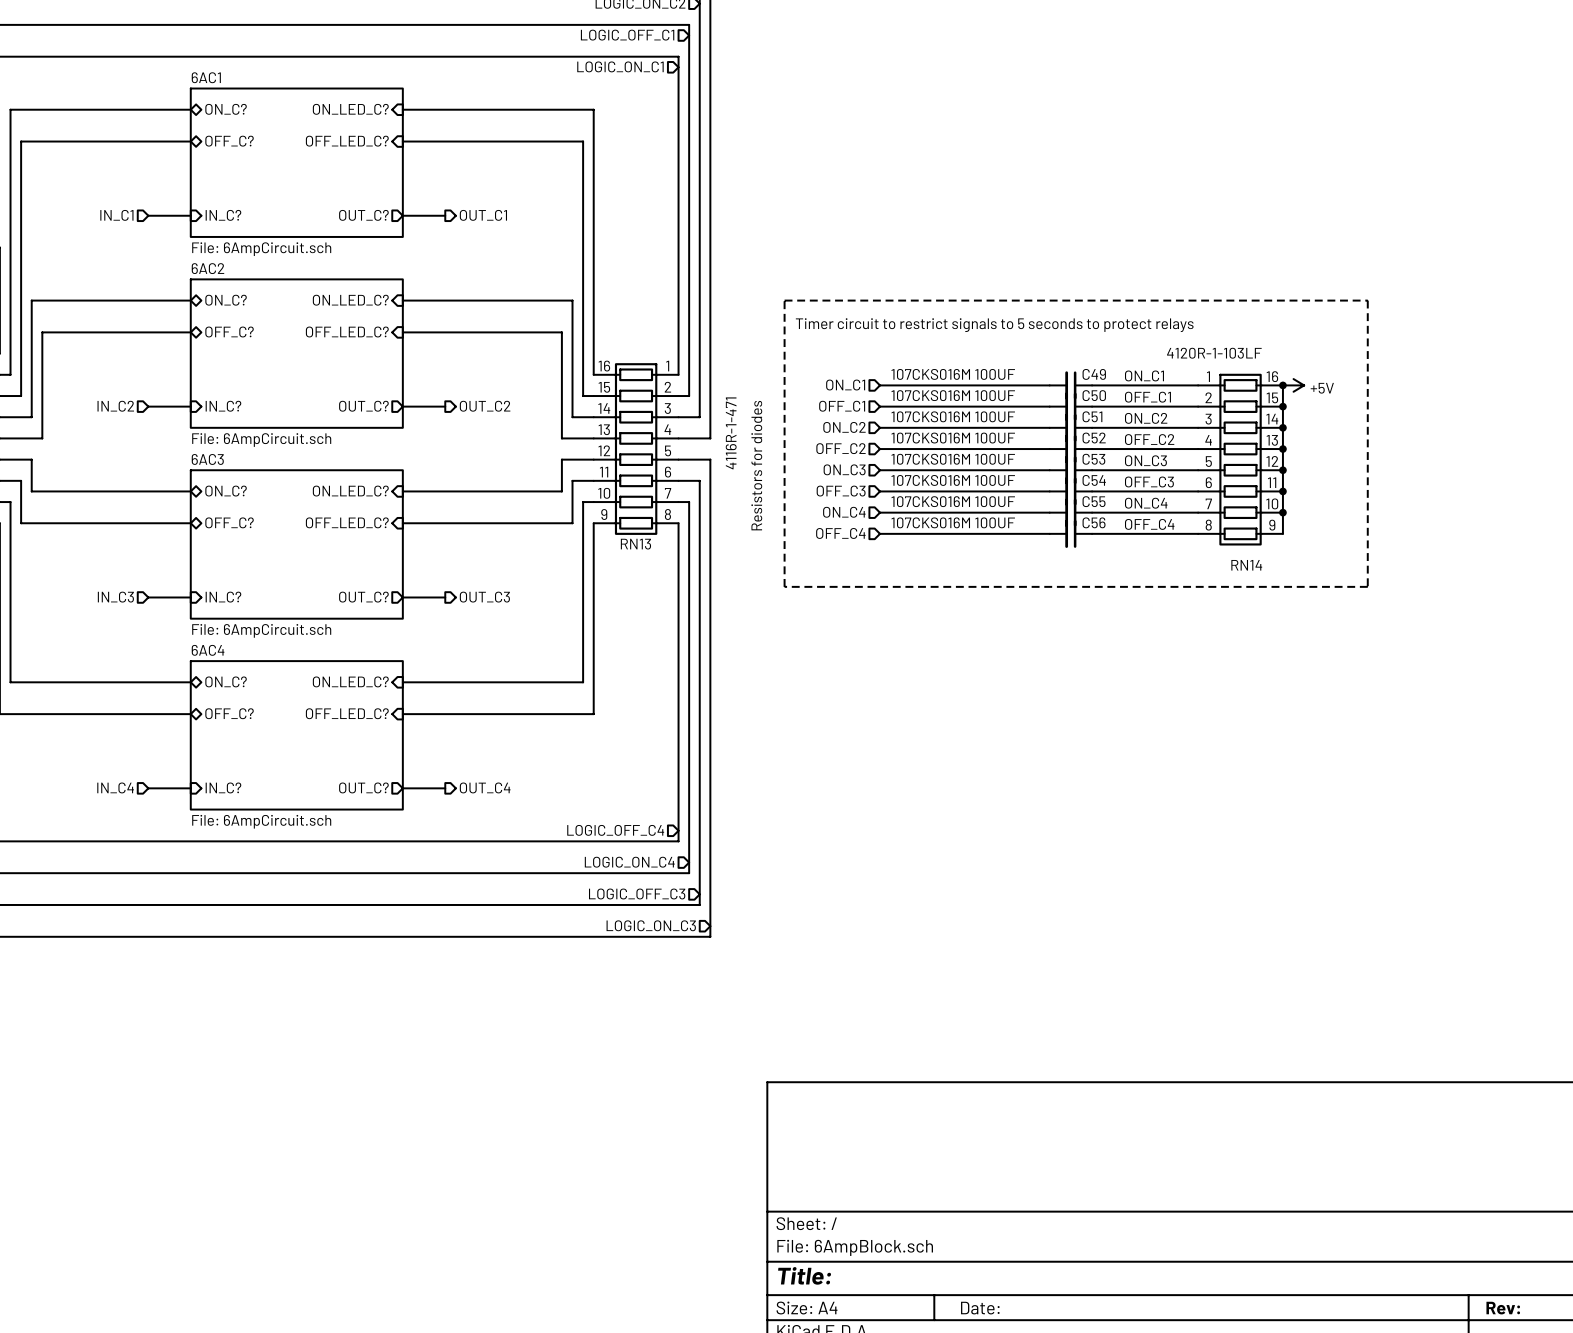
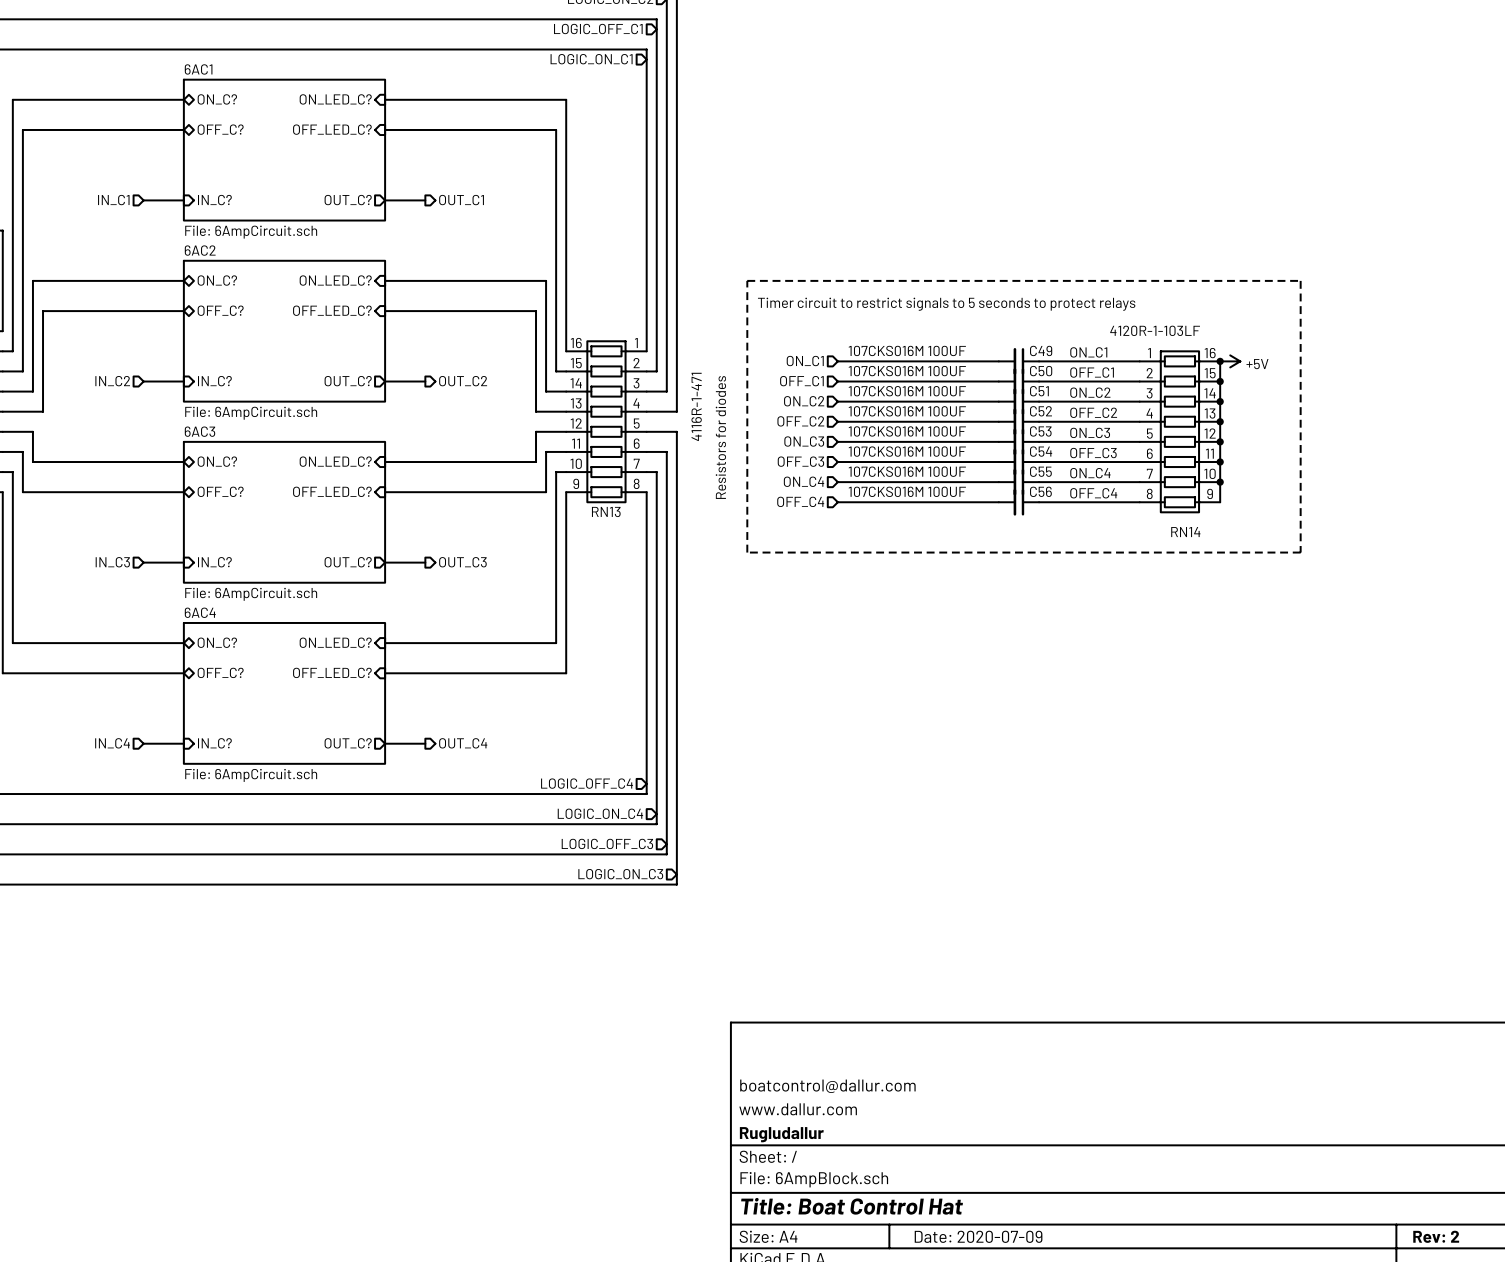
title block: none -> boatcontrol@dallur.com (827, 1086)
title block: none -> www.dallur.com (798, 1109)
title block: none -> Rugludallur (781, 1134)
title block: Title: (804, 1275) -> Title: Boat Control Hat (852, 1206)
title block: Date: (980, 1308) -> Date: 2020-07-09 (978, 1236)
title block: Rev: (1503, 1308) -> Rev: 2 (1436, 1236)

